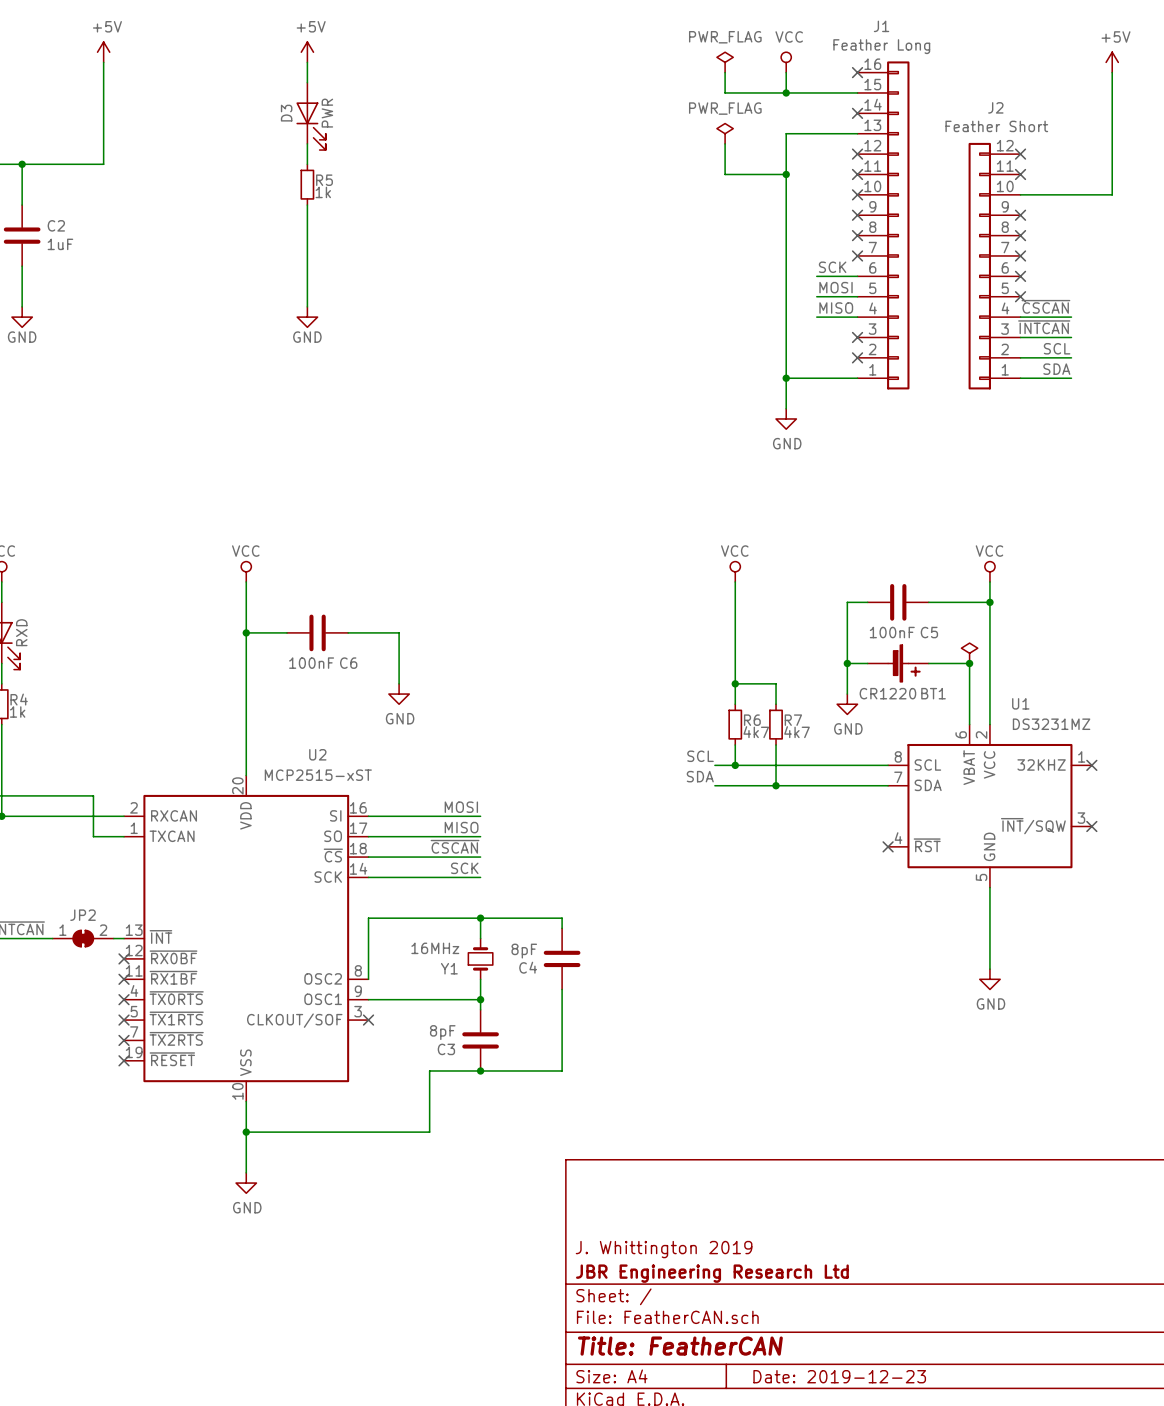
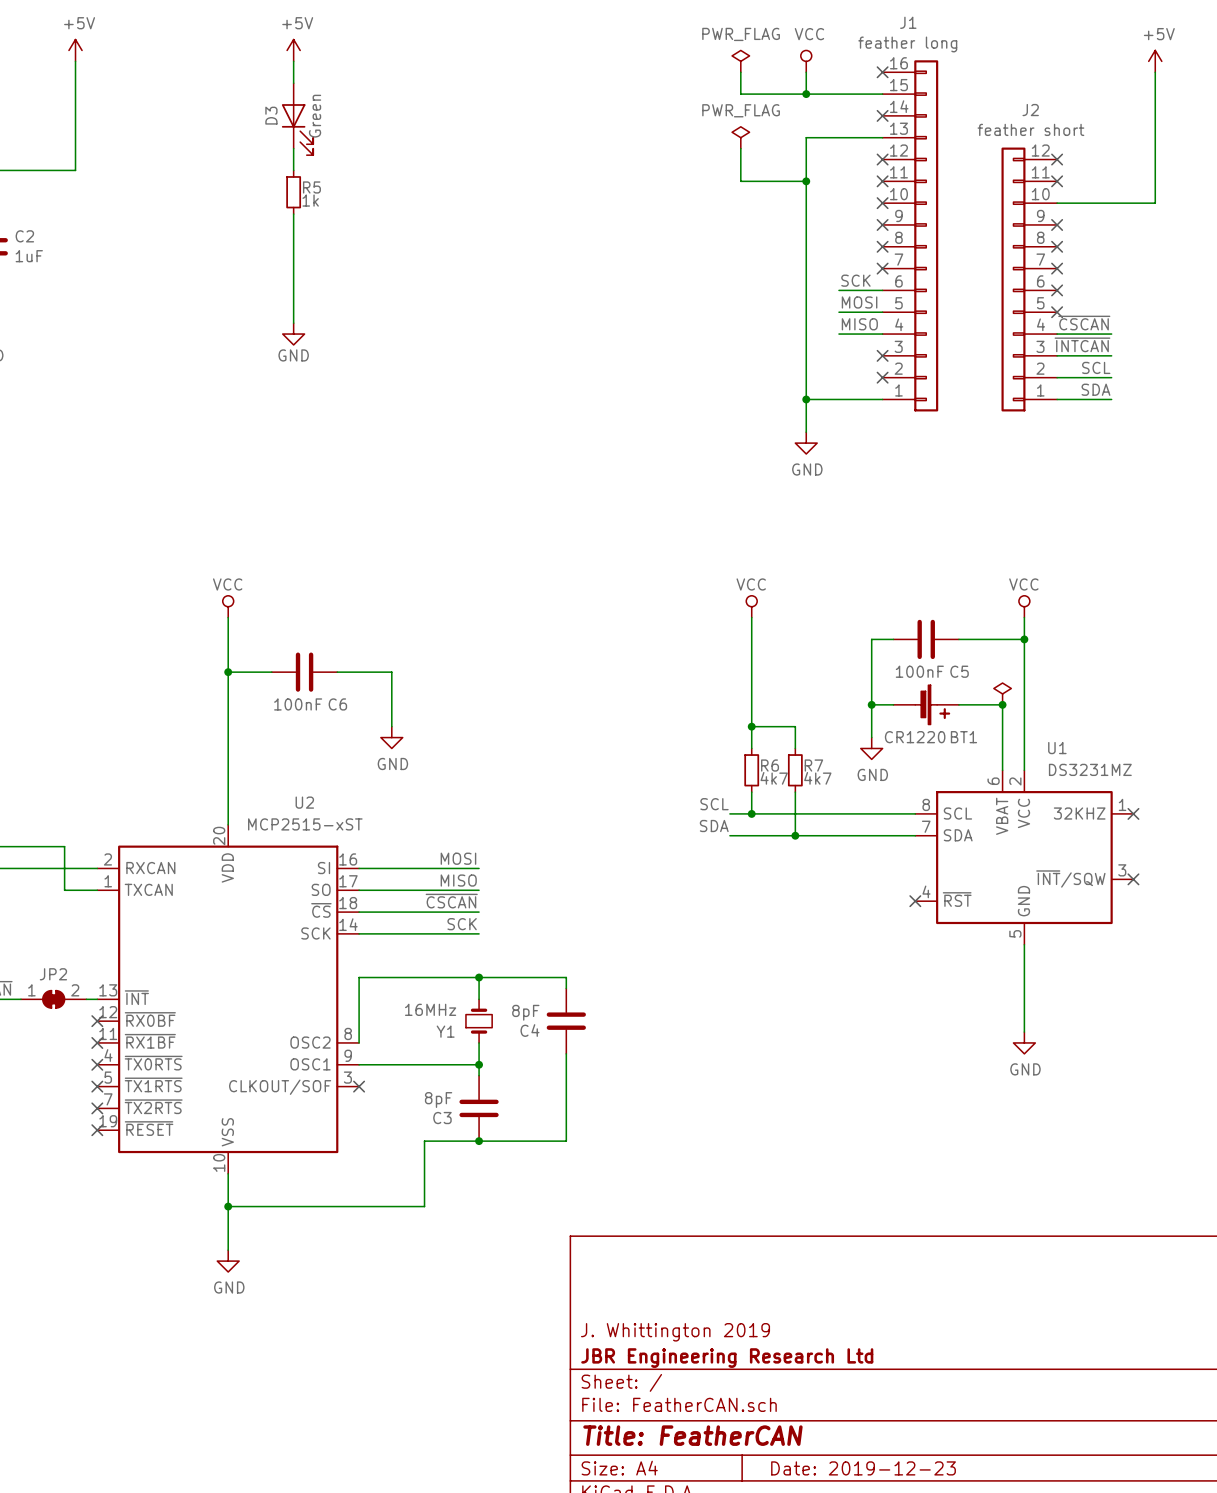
J1 value: Feather Long (881, 46) -> feather long (907, 44)
D3 value: PWR (327, 113) -> Green (315, 116)
J2 value: Feather Short (996, 126) -> feather short (1030, 129)

